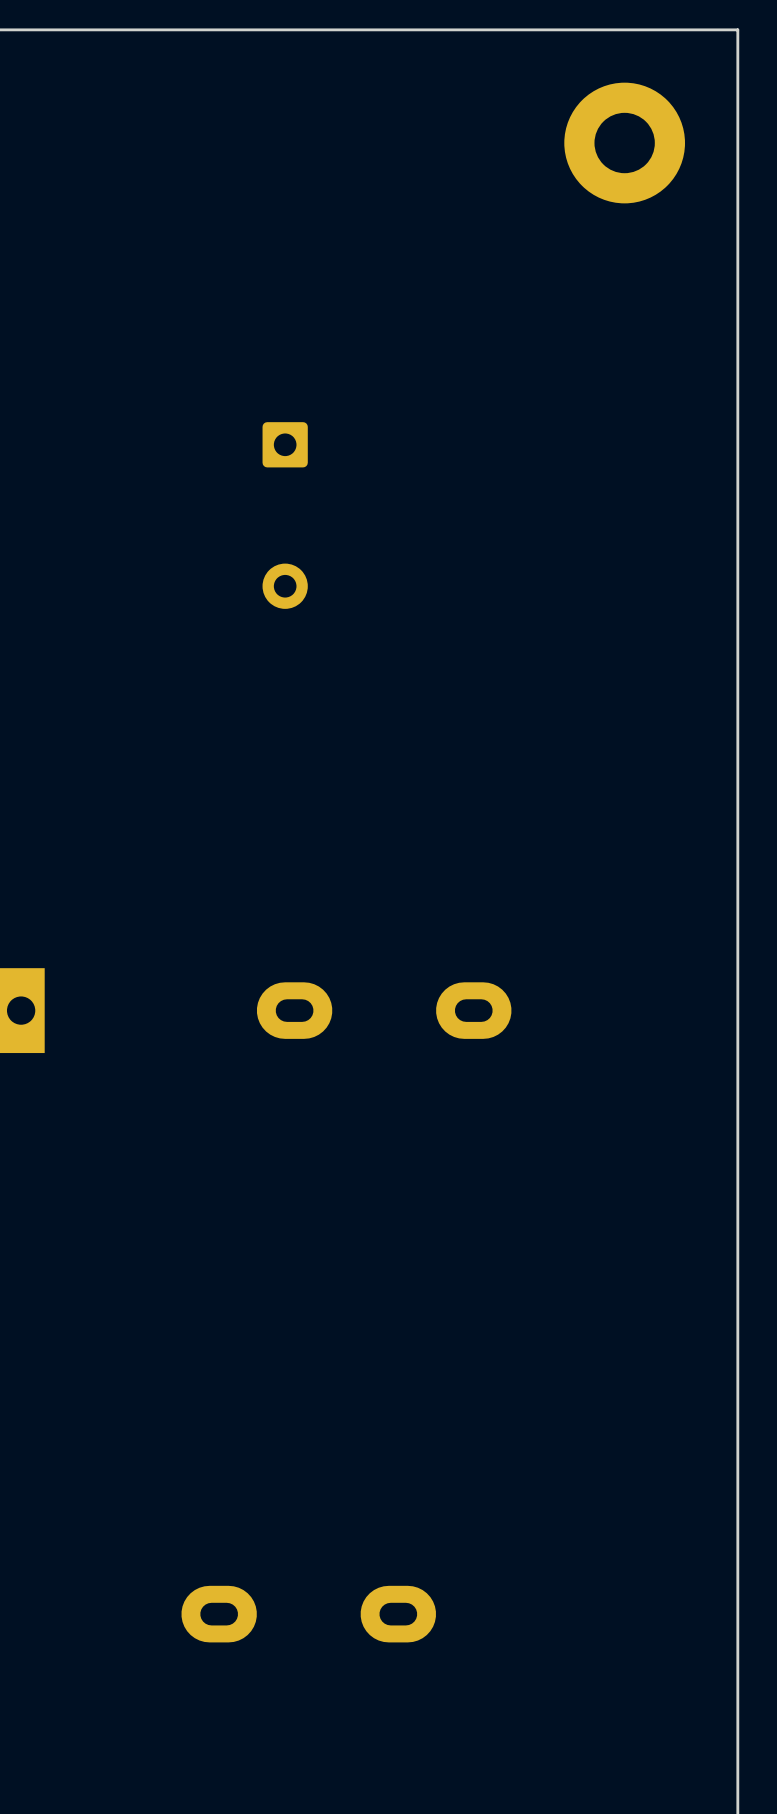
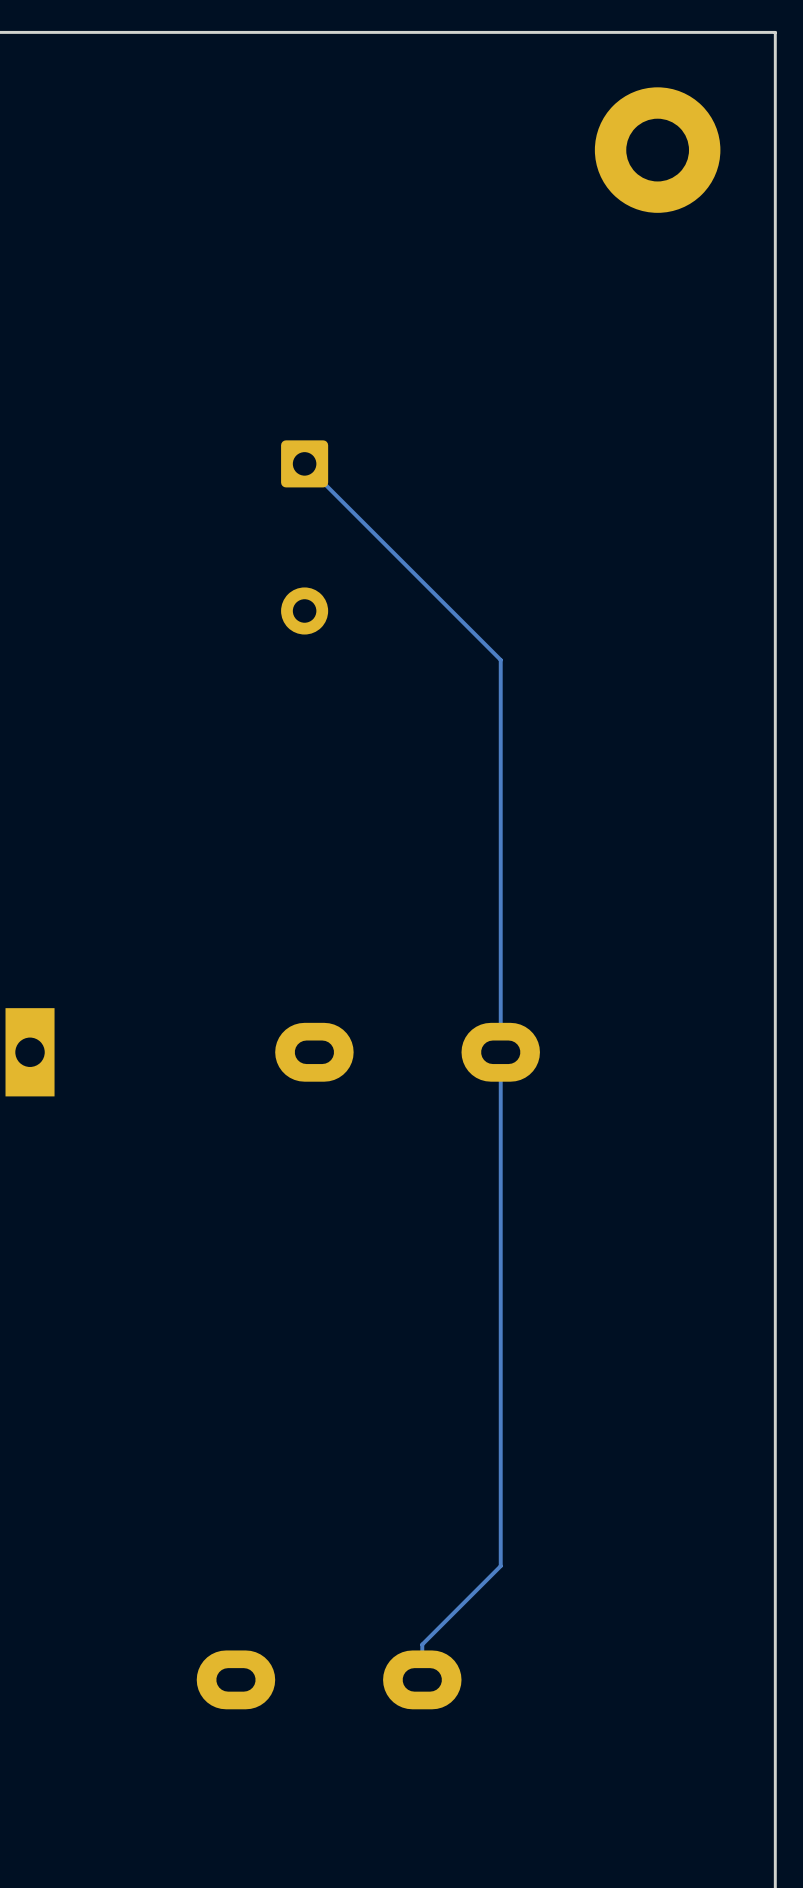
track: none -> (304, 463) (500, 660) (500, 1566) (422, 1644) (422, 1679)

